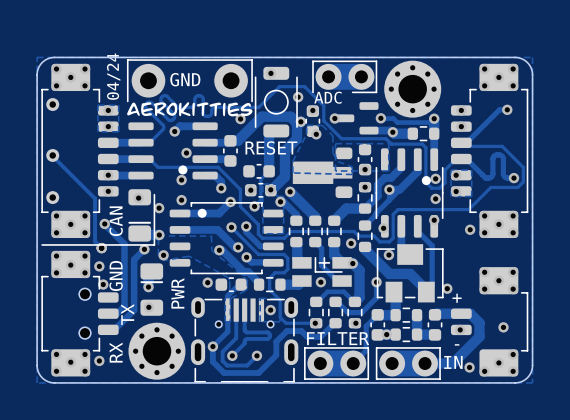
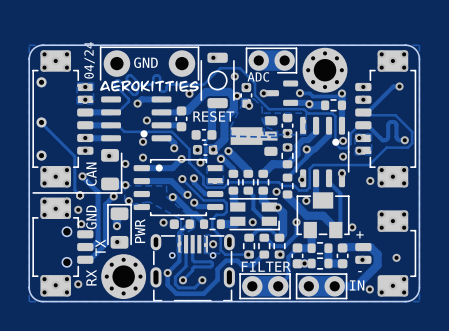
part footprint: [128, 189, 152, 242] -> [97, 148, 123, 194]
part footprint: [292, 257, 352, 287] -> [229, 198, 280, 231]
part footprint: [140, 263, 164, 316] -> [107, 204, 132, 249]

